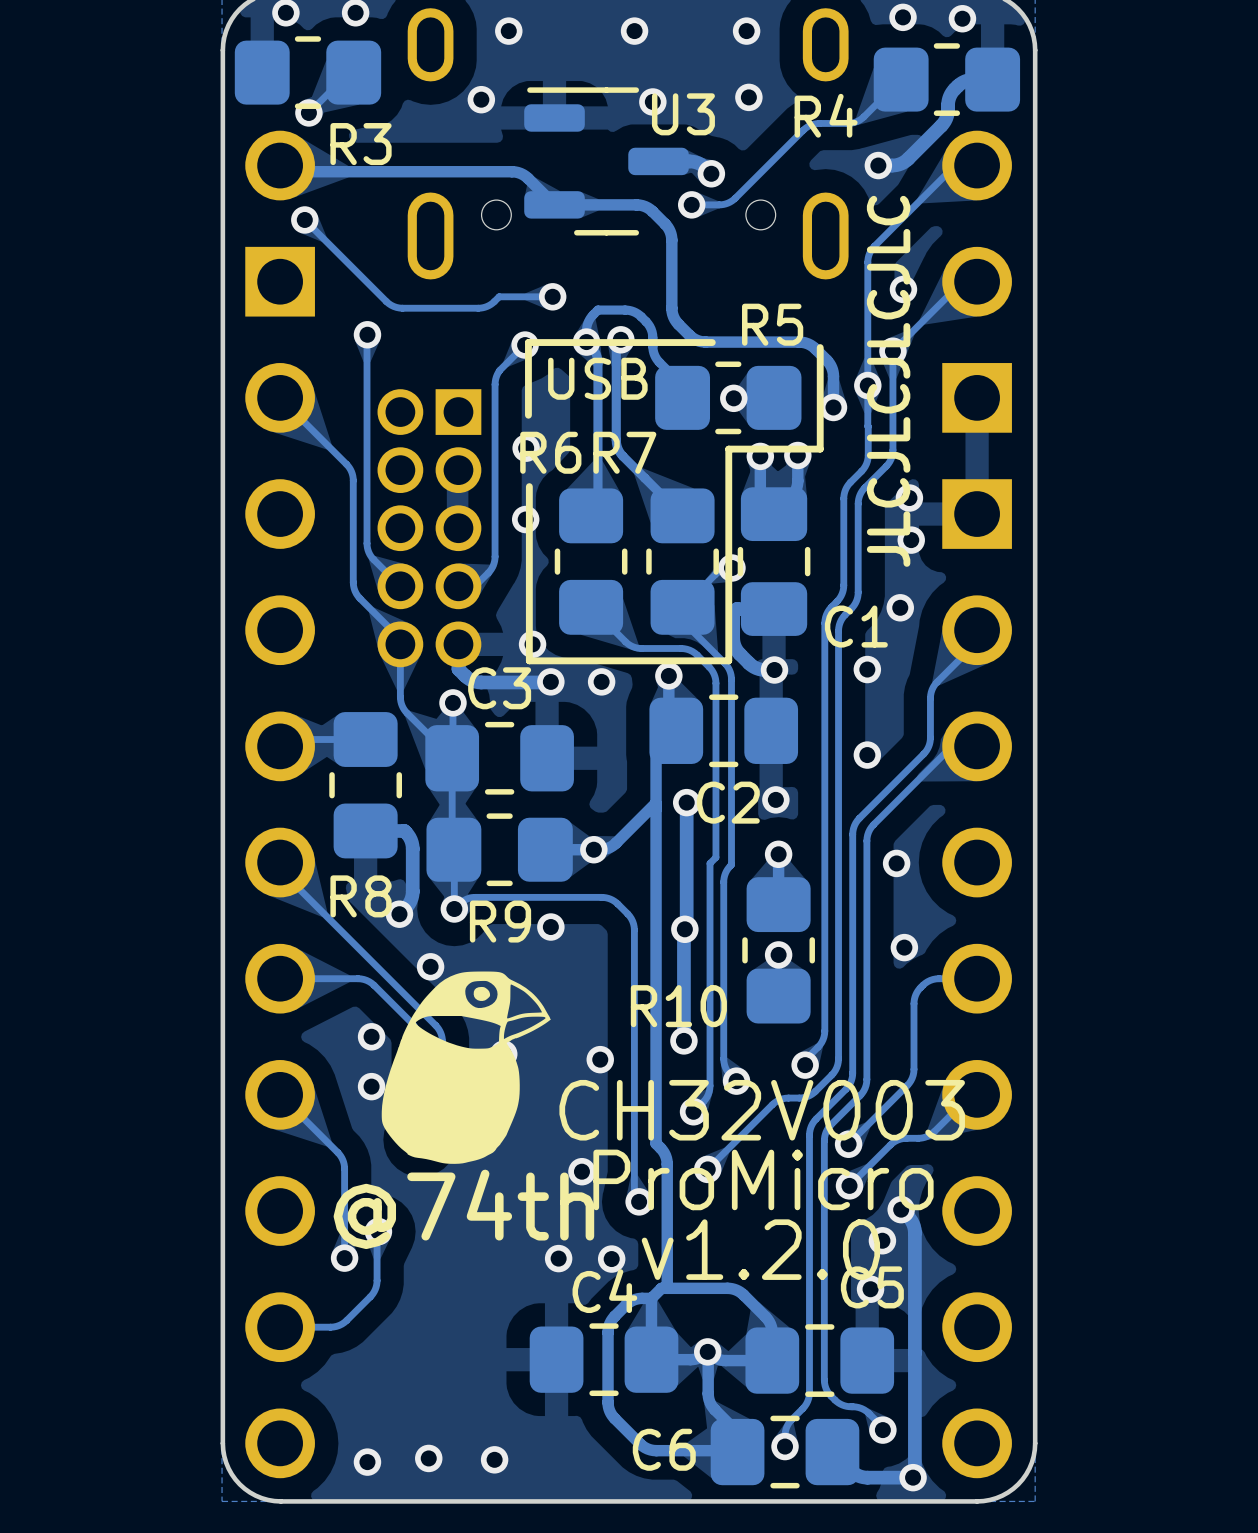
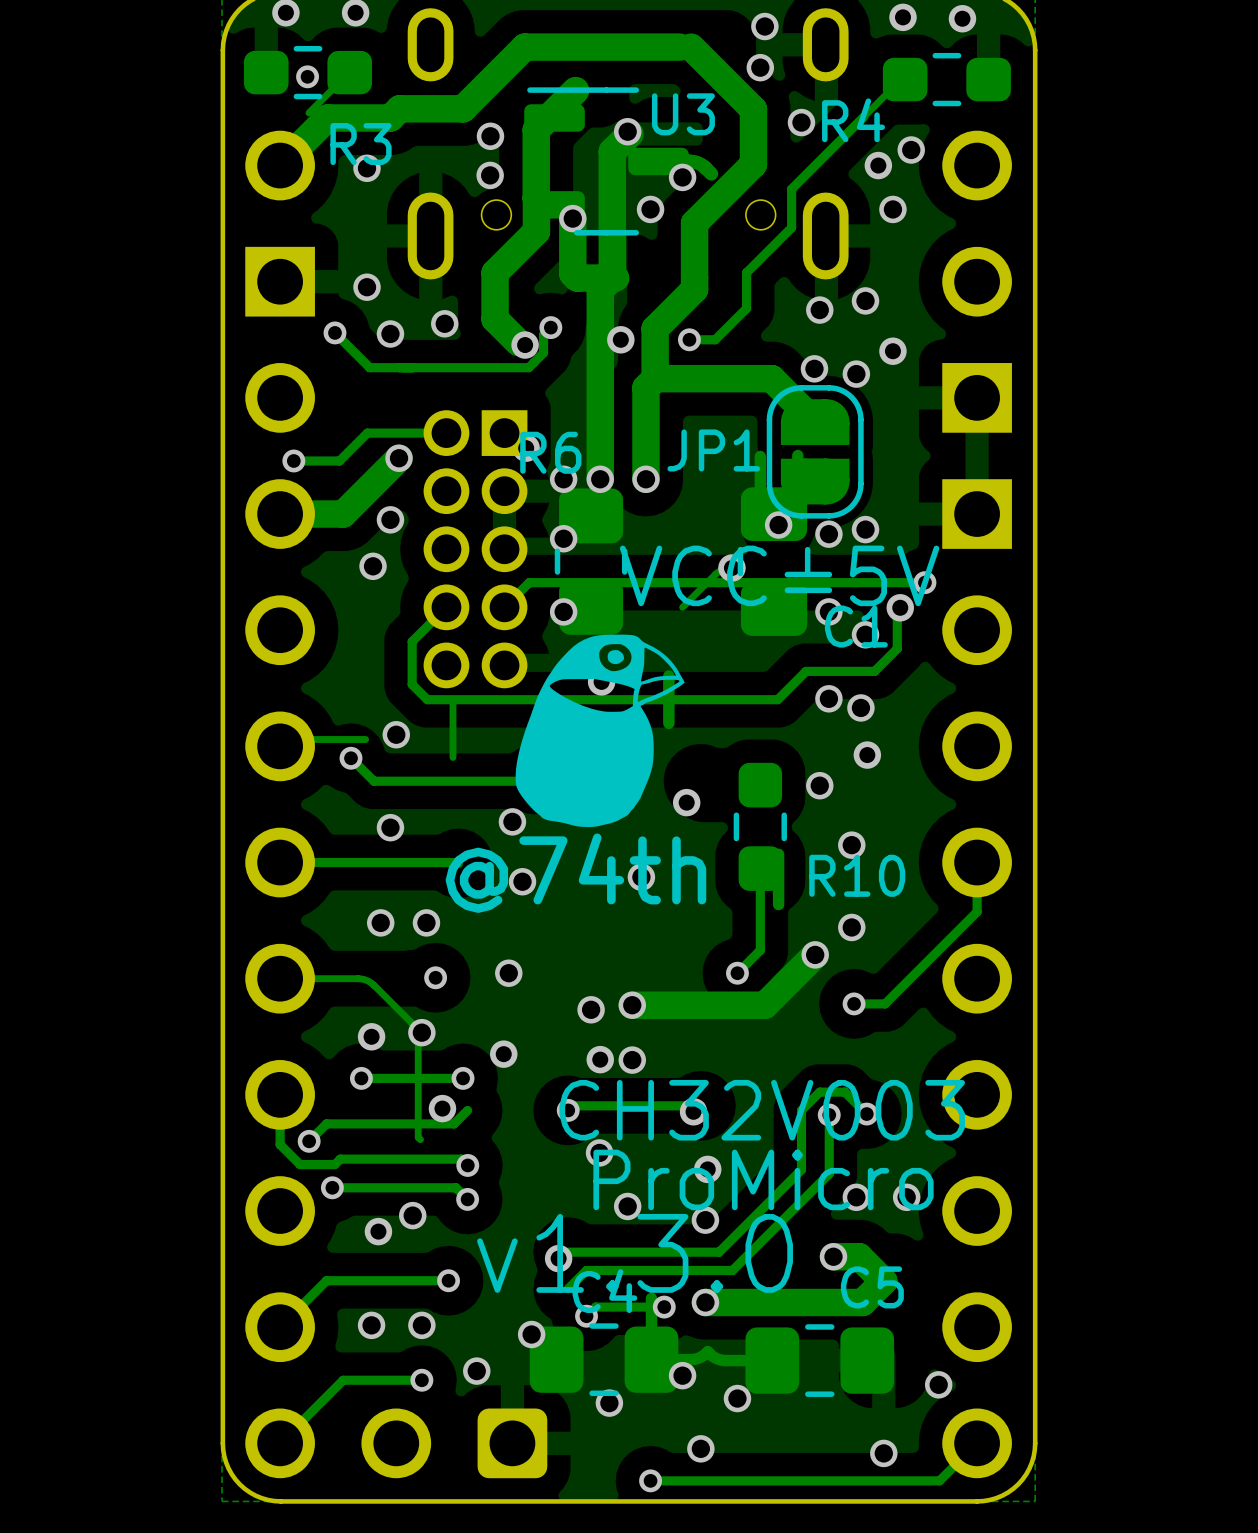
via: (508, 31) -> none
via: (634, 31) -> none
via position: (746, 31) -> (764, 26)
R3 footprint: [234, 36, 382, 109] -> [243, 45, 373, 100]
R4 footprint: [873, 43, 1021, 116] -> [882, 52, 1011, 107]
track: none -> (691, 47) (753, 109) (753, 164) (694, 223) (694, 289) (655, 328) (655, 378)
via: none -> (760, 67)
via: none -> (307, 76)
track: (973, 79) (962, 82) (953, 90) (949, 98) (947, 115) (943, 123) (906, 160) (896, 165) (878, 165) -> none
track: none -> (575, 90) (536, 129) (536, 198)
via: (748, 97) -> none
via: (481, 99) -> none
via: (652, 101) -> none
via: (308, 112) -> none
R4 name position: R4 (826, 115) -> R4 (853, 120)
track: (863, 116) (852, 123) (816, 123) (808, 126) (731, 201) (721, 204) (691, 204) -> (863, 116) (791, 189) (791, 227) (746, 272) (746, 308) (715, 339) (689, 339)
via: none -> (801, 122)
via: none -> (627, 131)
track: none -> (629, 133) (612, 151) (612, 278) (600, 290) (600, 479)
via: none -> (490, 136)
via: none -> (911, 149)
track: (280, 165) (286, 171) (514, 171) (525, 176) (554, 204) (636, 204) (645, 206) (665, 224) (670, 233) (672, 311) (678, 324) (691, 336) (701, 341) (799, 342) (810, 345) (831, 367) (833, 407) -> (280, 165) (327, 117) (390, 117) (399, 108) (463, 108) (524, 47) (679, 47)
track: (955, 165) (874, 246) (868, 255) (867, 426) -> none
via: none -> (367, 168)
via: (711, 173) -> none
via: none -> (490, 175)
via: none -> (682, 177)
drawing: [866, 195, 911, 567] -> none
track: none -> (536, 198) (536, 231) (495, 272) (495, 319) (518, 342)
via: (691, 204) -> none
via: none -> (650, 209)
via: none -> (892, 209)
track: none -> (572, 218) (572, 273) (577, 278) (615, 278)
via: none -> (572, 218)
track: (304, 219) (386, 301) (396, 307) (480, 308) (490, 304) (499, 296) (552, 296) -> none
via: (304, 219) -> none
track: (962, 281) (892, 351) (892, 456) (888, 464) (863, 489) (858, 499) (857, 596) (854, 605) (841, 619) (838, 630) (837, 1064) (833, 1072) (812, 1094) (803, 1097) (782, 1098) (774, 1102) (707, 1169) -> none
via: none -> (367, 287)
via: (903, 289) -> none
via: (552, 296) -> none
via: none -> (865, 300)
via: none -> (819, 310)
via: none -> (444, 323)
track: none -> (550, 327) (543, 334) (543, 352) (528, 367) (369, 367) (334, 332)
via: none -> (550, 327)
via: none -> (334, 332)
via position: (367, 334) -> (390, 333)
track: (367, 335) (367, 545) (372, 557) (400, 586) -> none
track: (620, 339) (616, 344) (616, 440) (617, 448) (622, 456) (682, 515) -> none
via: none -> (689, 339)
via: (586, 342) -> none
line: (712, 342) (528, 342) (528, 415) -> none
track: (525, 345) (499, 370) (495, 379) (494, 558) (491, 569) (474, 586) -> none
line: (820, 347) (820, 449) (728, 449) (728, 660) (529, 660) (529, 486) -> none
via: none -> (814, 368)
text: USB (597, 378) -> none
track: none -> (655, 378) (771, 378) (815, 422)
track: none -> (655, 378) (645, 387) (645, 479)
track: (682, 385) (656, 359) (653, 350) (651, 329) (639, 315) (627, 310) (597, 310) (591, 316) (586, 326) (586, 342) (594, 351) (597, 360) (597, 509) -> none
via position: (867, 385) -> (856, 374)
track: (280, 397) (350, 469) (353, 480) (354, 588) (359, 598) (400, 638) -> none
R5: (728, 397) -> none
via: (733, 398) -> none
via: (833, 407) -> none
track: (868, 426) (866, 463) (847, 485) (844, 494) (843, 589) (839, 597) (827, 611) (825, 620) (824, 1030) (821, 1042) (805, 1060) (805, 1065) -> none
track: none -> (446, 433) (367, 433) (339, 460) (293, 460)
JP1: none -> (815, 451)
via: (797, 455) -> none
via: (760, 456) -> none
track: none -> (399, 458) (343, 514) (280, 514)
via: none -> (399, 458)
via: none -> (293, 460)
via: none -> (563, 479)
via: none -> (600, 479)
via: none -> (645, 479)
via: (909, 498) -> none
via: none -> (390, 519)
via: (525, 519) -> none
via: none -> (778, 525)
part position: (429, 528) -> (475, 549)
via: none -> (865, 529)
via: none -> (828, 534)
via: none -> (563, 538)
via: (911, 540) -> none
R7: (682, 561) -> none
via: none -> (373, 566)
text: none -> VCC=5V (779, 575)
track: none -> (924, 582) (529, 582) (504, 607)
via: none -> (924, 582)
track: none -> (897, 605) (897, 648) (874, 671) (806, 671) (777, 699) (427, 699) (412, 684) (412, 641) (446, 607)
track: (591, 607) (630, 645) (639, 648) (689, 650) (710, 668) (715, 678) (715, 857) (710, 863) (710, 1085) (706, 1097) (693, 1111) -> none
track: (774, 609) (736, 609) (733, 612) (733, 637) (737, 650) (751, 665) (759, 669) (774, 669) -> none
via: none -> (563, 611)
via: none -> (828, 611)
track: (682, 621) (726, 664) (731, 677) (731, 864) (725, 873) (723, 882) (723, 1058) (726, 1070) (736, 1081) -> none
via: none -> (865, 634)
track: (977, 642) (937, 682) (932, 689) (930, 740) (926, 750) (859, 818) (853, 828) (852, 1075) (847, 1087) (814, 1121) (809, 1132) (809, 1395) (804, 1406) (787, 1425) (785, 1433) (785, 1446) -> none
track: (400, 644) (402, 705) (407, 713) (452, 758) (452, 848) -> none
track: (458, 644) (458, 669) (472, 680) (481, 682) (550, 682) -> none
via: (532, 644) -> none
via: (774, 669) -> none
via: (867, 669) -> none
via: (668, 675) -> none
via: (550, 681) -> none
via: none -> (828, 698)
via: (452, 702) -> none
via: none -> (860, 707)
C2: (723, 730) -> none
via: none -> (396, 734)
track: (951, 746) (873, 824) (867, 834) (866, 1082) (862, 1093) (829, 1126) (824, 1138) (825, 1385) (829, 1393) (836, 1401) (844, 1405) (864, 1409) (882, 1427) (882, 1430) -> none
track: (656, 751) (656, 1143) (664, 1152) (667, 1161) (667, 1288) -> none
track: none -> (351, 758) (373, 781) (532, 781) (534, 779)
via: none -> (351, 758)
C3: (499, 758) -> none
R8: (365, 785) -> none
via: none -> (819, 785)
via: (775, 799) -> none
track: (686, 802) (683, 1040) -> none
track: (655, 803) (616, 843) (608, 847) (545, 849) -> none
via: none -> (512, 821)
via: none -> (390, 827)
track: (365, 830) (404, 830) (411, 840) (412, 848) (412, 895) (408, 904) (399, 914) -> none
via: none -> (851, 845)
R9: (499, 849) -> none
via: (593, 849) -> none
track: (454, 850) (454, 909) (464, 900) (472, 897) (603, 897) (616, 902) (631, 918) (634, 930) (634, 1193) (639, 1198) (639, 1201) -> none
via: (778, 854) -> none
track: none -> (280, 862) (458, 863)
track: none -> (977, 862) (977, 911) (885, 1003) (854, 1003)
via: (896, 863) -> none
track: none -> (760, 868) (760, 950) (737, 973)
track: (280, 869) (438, 1028) (442, 1041) (442, 1108) -> none
via: none -> (641, 877)
R10 footprint: [742, 877, 815, 1024] -> [733, 762, 787, 891]
via: none -> (522, 881)
via: (454, 909) -> none
via: (399, 914) -> none
via: none -> (380, 922)
via: none -> (426, 922)
via: (550, 927) -> none
via: none -> (851, 927)
via: (684, 929) -> none
via: (904, 947) -> none
via: (778, 954) -> none
track: none -> (815, 954) (764, 1005) (632, 1005)
via: none -> (815, 954)
via position: (430, 966) -> (435, 977)
via: none -> (508, 973)
via: none -> (737, 973)
track: (977, 978) (936, 978) (927, 981) (919, 989) (914, 1001) (913, 1069) (912, 1078) (907, 1085) (848, 1144) -> none
via: none -> (854, 1003)
via: none -> (632, 1005)
R10 name position: R10 (678, 1006) -> R10 (857, 875)
via: none -> (591, 1009)
via: none -> (421, 1032)
via: (683, 1040) -> none
via: none -> (632, 1060)
via: (805, 1065) -> none
drawing position: (466, 1067) -> (600, 730)
track: none -> (463, 1078) (361, 1078)
via: none -> (463, 1078)
via: (736, 1081) -> none
via position: (371, 1086) -> (361, 1078)
track: (280, 1094) (337, 1152) (342, 1160) (344, 1168) (344, 1258) -> (280, 1094) (280, 1144) (300, 1164) (334, 1164) (340, 1159) (461, 1159) (467, 1165)
track: (971, 1094) (930, 1134) (922, 1137) (900, 1139) (892, 1143) (849, 1185) -> none
track: none -> (700, 1105) (572, 1105) (568, 1110)
track: none -> (467, 1110) (454, 1123) (326, 1123) (309, 1141)
via: none -> (568, 1110)
track: none -> (829, 1114) (829, 1173) (732, 1270) (586, 1270) (568, 1288)
via: none -> (829, 1114)
track: none -> (866, 1114) (844, 1092) (819, 1092) (801, 1110) (801, 1169) (719, 1252) (568, 1252)
via: none -> (866, 1114)
via: none -> (309, 1141)
via: (848, 1144) -> none
via: none -> (467, 1165)
via position: (581, 1171) -> (599, 1152)
via position: (849, 1185) -> (856, 1197)
track: none -> (332, 1187) (456, 1187) (467, 1199)
via: none -> (332, 1187)
via: none -> (467, 1199)
via position: (639, 1201) -> (627, 1206)
drawing position: (463, 1209) -> (575, 873)
track: (901, 1209) (911, 1221) (914, 1232) (914, 1475) (913, 1477) (865, 1477) (851, 1470) -> none
via position: (901, 1209) -> (906, 1197)
via: none -> (412, 1215)
via: none -> (705, 1220)
track: (378, 1231) (376, 1287) (371, 1295) (346, 1320) (333, 1327) (280, 1327) -> (448, 1280) (326, 1280) (280, 1327)
via: (882, 1240) -> none
text: v1.2.0 (760, 1249) -> v1.3.0 (635, 1253)
track: none -> (833, 1256) (859, 1256) (883, 1281) (862, 1302) (705, 1302)
via: none -> (833, 1256)
via: (344, 1258) -> none
via: (611, 1259) -> none
via: none -> (448, 1280)
via: (870, 1289) -> none
via: none -> (705, 1302)
track: none -> (664, 1307) (595, 1307) (586, 1316)
via: none -> (664, 1307)
via: none -> (586, 1316)
via: none -> (371, 1325)
via: none -> (421, 1325)
track: (772, 1333) (767, 1319) (743, 1295) (736, 1290) (727, 1288) (661, 1288) (651, 1298) (637, 1298) (629, 1302) (612, 1318) (608, 1326) (609, 1408) (613, 1416) (640, 1443) (653, 1450) (736, 1450) -> none
via: none -> (531, 1334)
via position: (707, 1351) -> (682, 1375)
track: (708, 1352) (709, 1402) (737, 1432) -> none
via: none -> (476, 1371)
track: none -> (421, 1380) (343, 1380) (280, 1443)
via: none -> (421, 1380)
via: none -> (938, 1384)
via: none -> (737, 1398)
via: none -> (609, 1403)
via position: (882, 1430) -> (883, 1453)
part: none -> (454, 1443)
track: none -> (977, 1443) (939, 1480) (650, 1480)
via: (785, 1446) -> none
via: none -> (700, 1448)
C6: (785, 1452) -> none
via: (428, 1458) -> none
via: (494, 1459) -> none
via: (367, 1462) -> none
via: (913, 1477) -> none
via: none -> (650, 1480)

